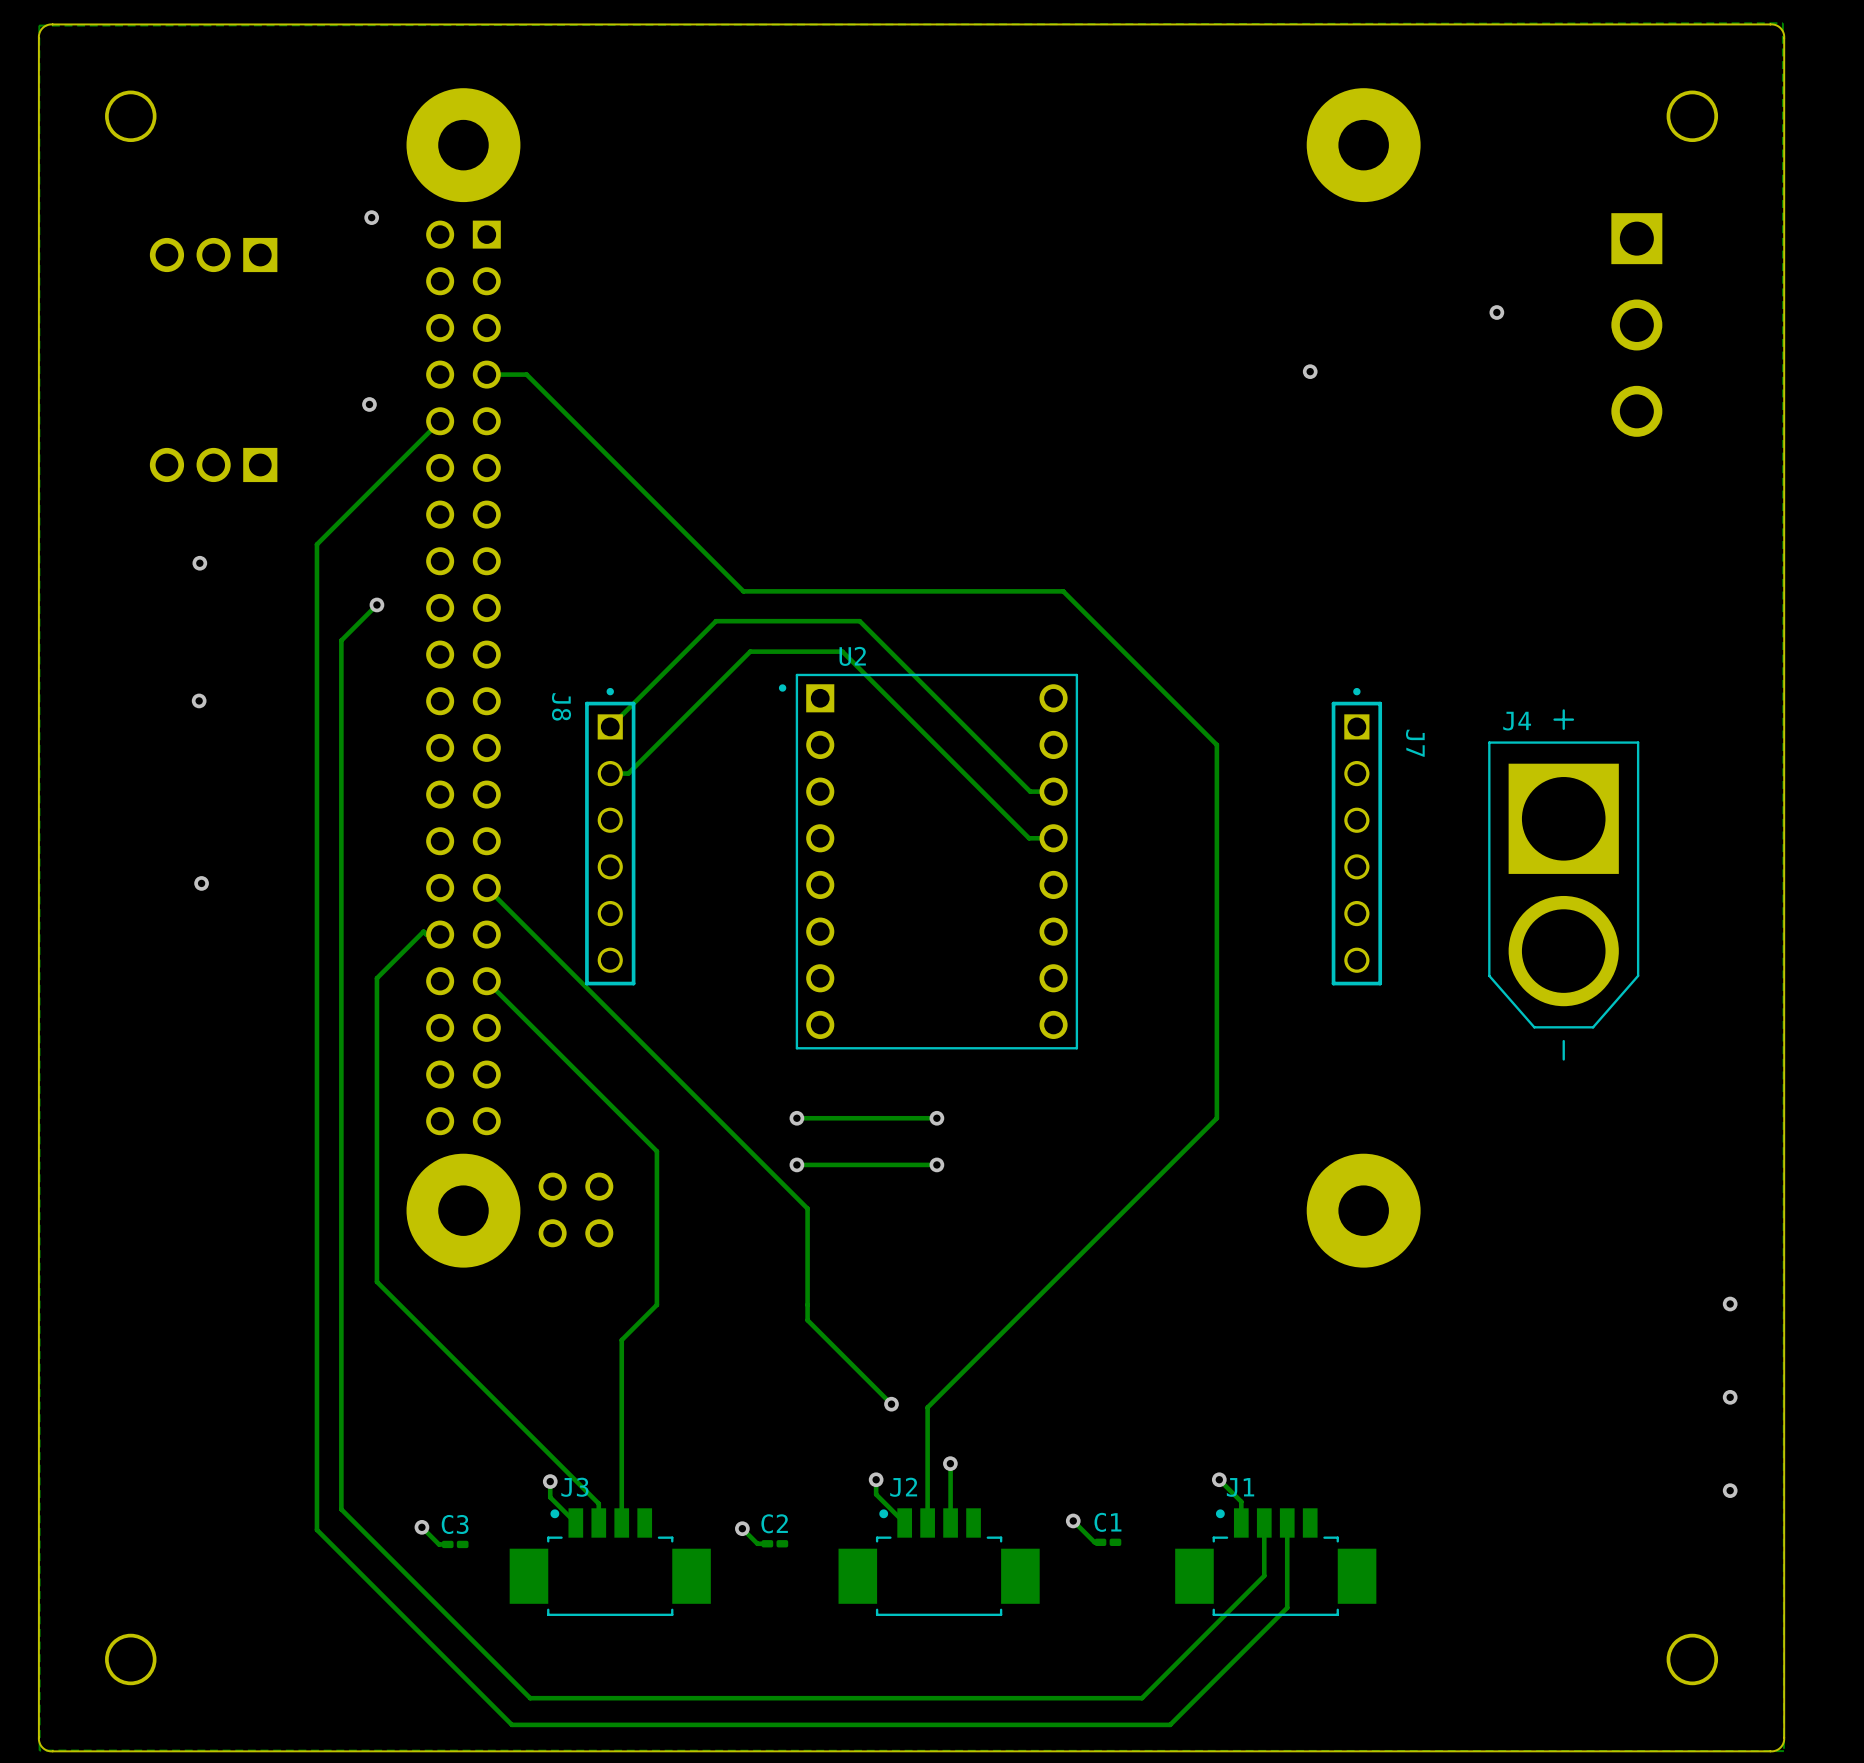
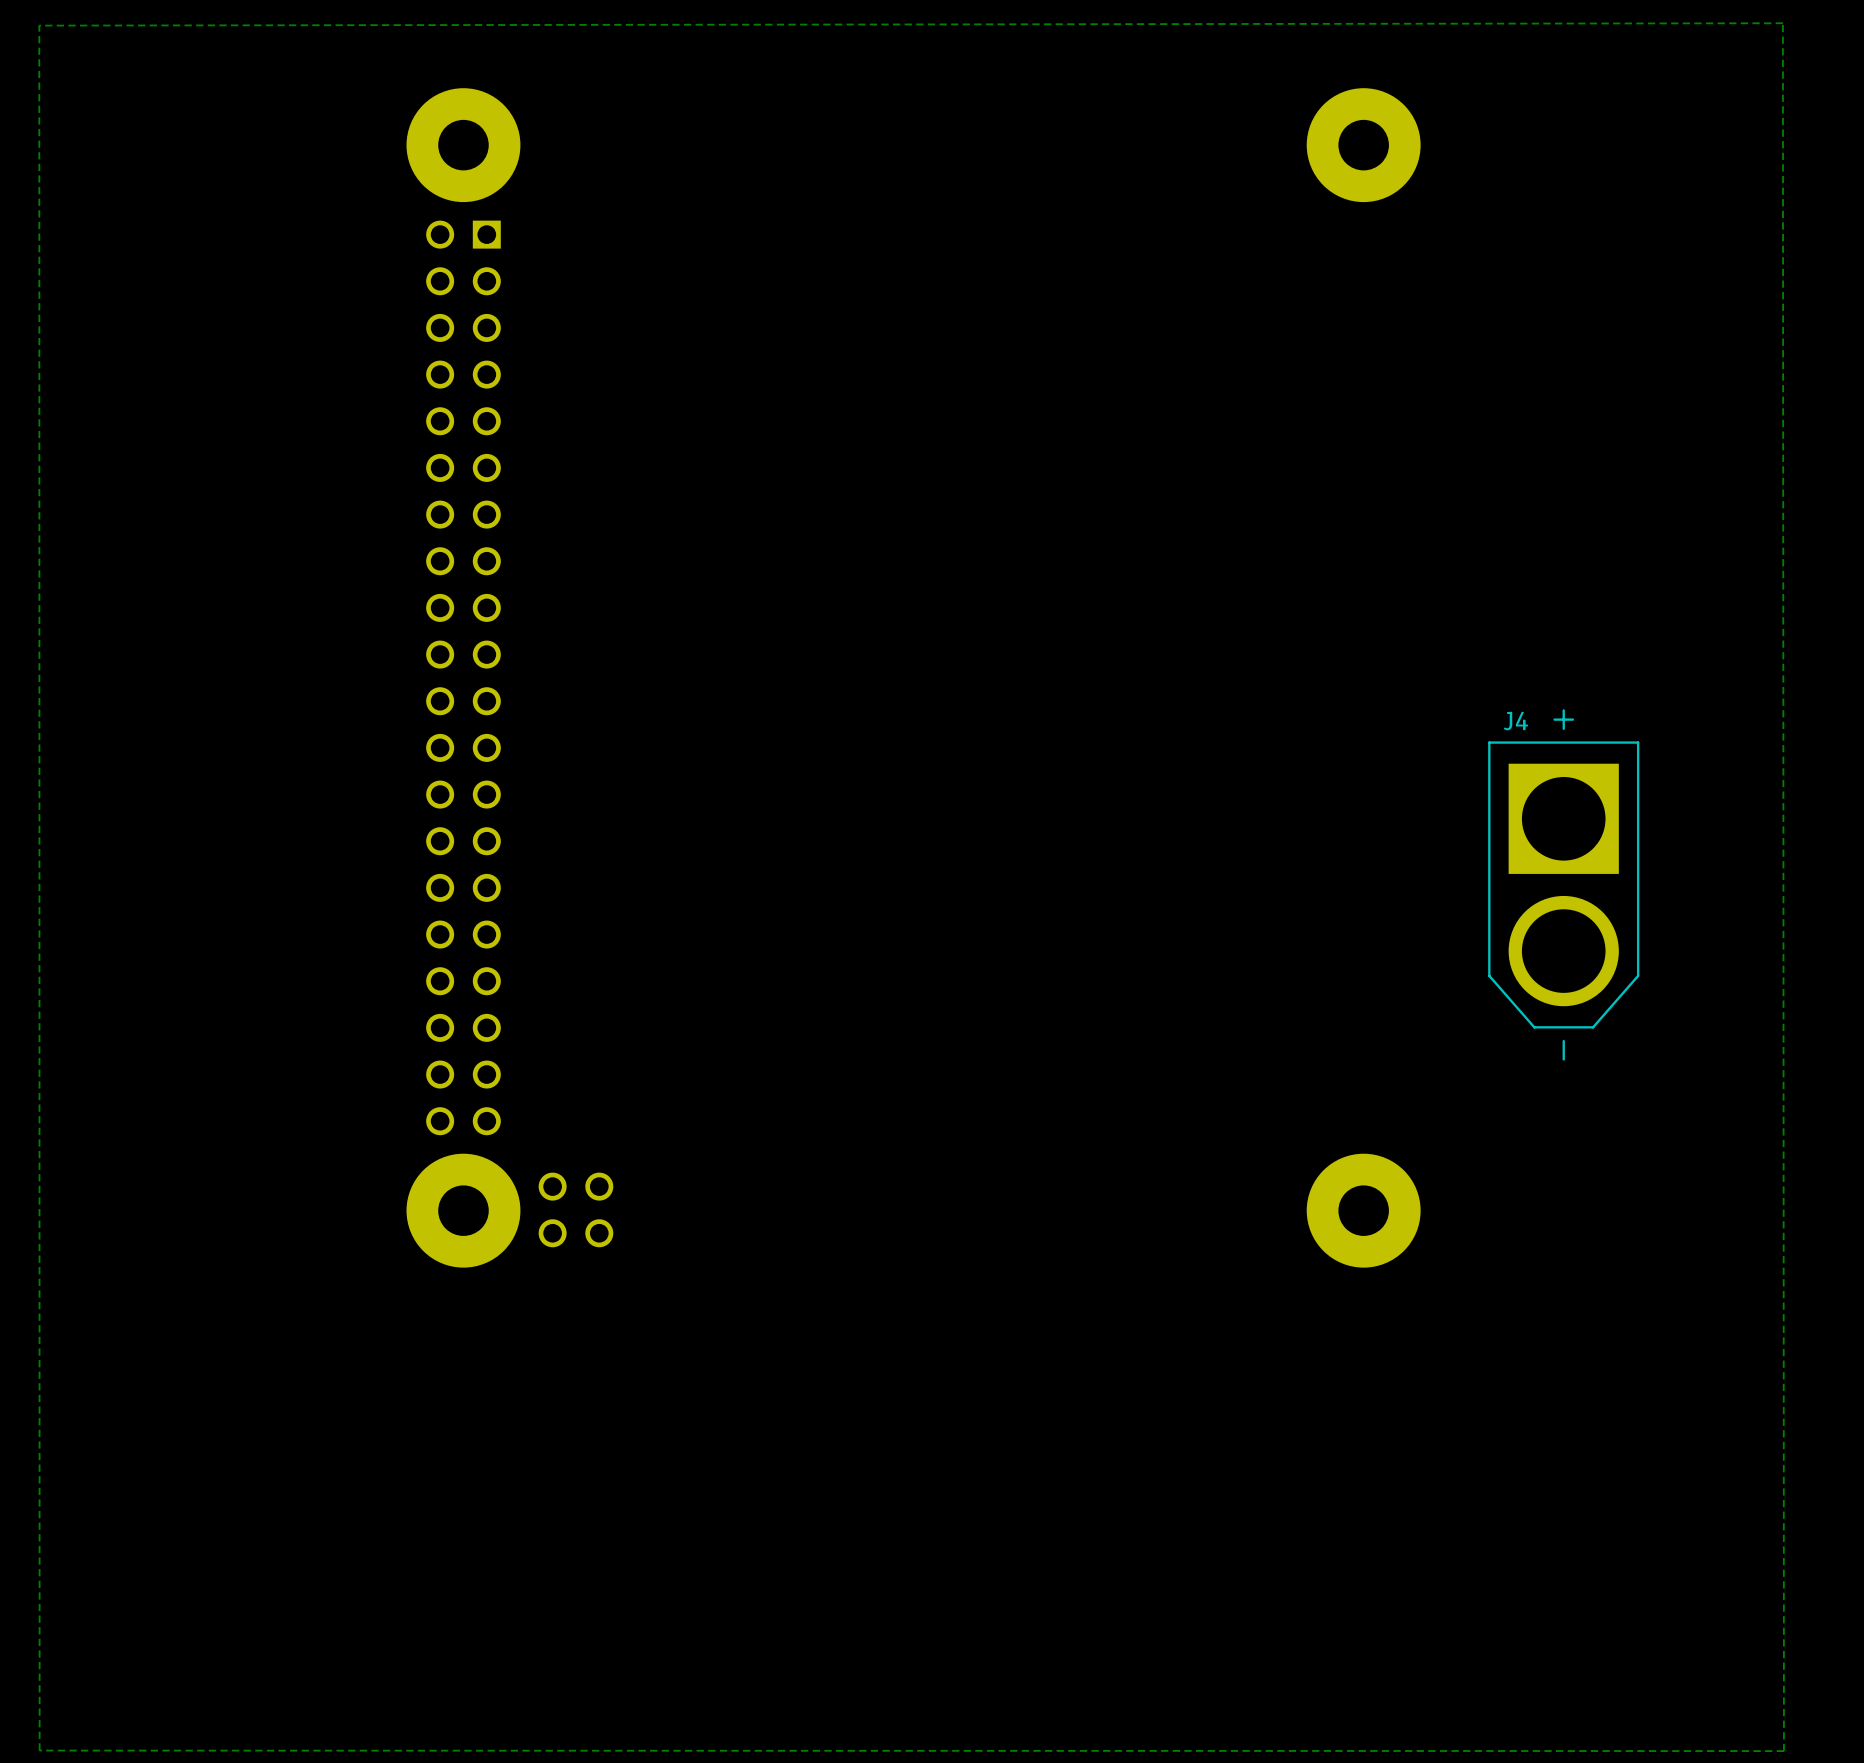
board edge: (1770, 24) (51, 24) (42, 28) (38, 36) (38, 1739) (42, 1747) (51, 1751) (1771, 1751) (1780, 1747) (1784, 1739) (1784, 36) (1780, 28) (1770, 24) -> none
round board edge: [105, 90, 157, 143] -> none
round board edge: [1666, 90, 1719, 143] -> none
via: (371, 217) -> none
part: (213, 254) -> none
via: (1496, 312) -> none
part: (1636, 324) -> none
via: (1310, 371) -> none
track: (486, 374) (526, 374) (743, 591) (1063, 591) (1216, 744) (1216, 1118) (927, 1407) (927, 1522) -> none
via: (369, 404) -> none
track: (440, 421) (316, 544) (316, 1529) (511, 1724) (1170, 1724) (1287, 1607) (1287, 1522) -> none
part: (213, 464) -> none
via: (199, 563) -> none
track: (376, 604) (341, 640) (341, 1509) (530, 1698) (1141, 1698) (1264, 1575) (1264, 1522) -> none
via: (376, 604) -> none
via: (199, 700) -> none
track: (610, 726) (715, 621) (859, 621) (1030, 791) (1053, 791) -> none
track: (610, 773) (628, 773) (750, 651) (842, 651) (1029, 838) (1053, 838) -> none
J8: (610, 836) -> none
J7: (1356, 836) -> none
U2: (928, 861) -> none
via: (201, 883) -> none
track: (486, 887) (807, 1208) (807, 1320) (891, 1404) -> none
track: (440, 934) (426, 934) (423, 931) (376, 978) (376, 1281) (598, 1503) (598, 1522) -> none
track: (486, 981) (656, 1151) (656, 1304) (621, 1340) (621, 1522) -> none
via: (796, 1118) -> none
track: (936, 1118) (796, 1118) -> none
via: (936, 1118) -> none
via: (796, 1164) -> none
track: (936, 1164) (796, 1164) -> none
via: (936, 1164) -> none
via: (1730, 1304) -> none
via: (1730, 1397) -> none
via: (891, 1404) -> none
track: (950, 1463) (950, 1522) -> none
via: (950, 1463) -> none
track: (876, 1479) (876, 1494) (904, 1522) -> none
via: (876, 1479) -> none
track: (1219, 1479) (1241, 1501) (1241, 1522) -> none
via: (1219, 1479) -> none
track: (550, 1481) (550, 1497) (575, 1522) -> none
via: (550, 1481) -> none
via: (1730, 1490) -> none
track: (1073, 1520) (1094, 1542) (1100, 1542) -> none
via: (1073, 1520) -> none
track: (421, 1527) (439, 1544) (447, 1544) -> none
via: (421, 1527) -> none
track: (742, 1528) (757, 1543) (767, 1543) -> none
via: (742, 1528) -> none
C1: (1107, 1542) -> none
C2: (774, 1543) -> none
C3: (455, 1544) -> none
J3: (610, 1562) -> none
J2: (939, 1562) -> none
J1: (1275, 1562) -> none
round board edge: [105, 1633, 157, 1686] -> none
round board edge: [1666, 1633, 1719, 1686] -> none

